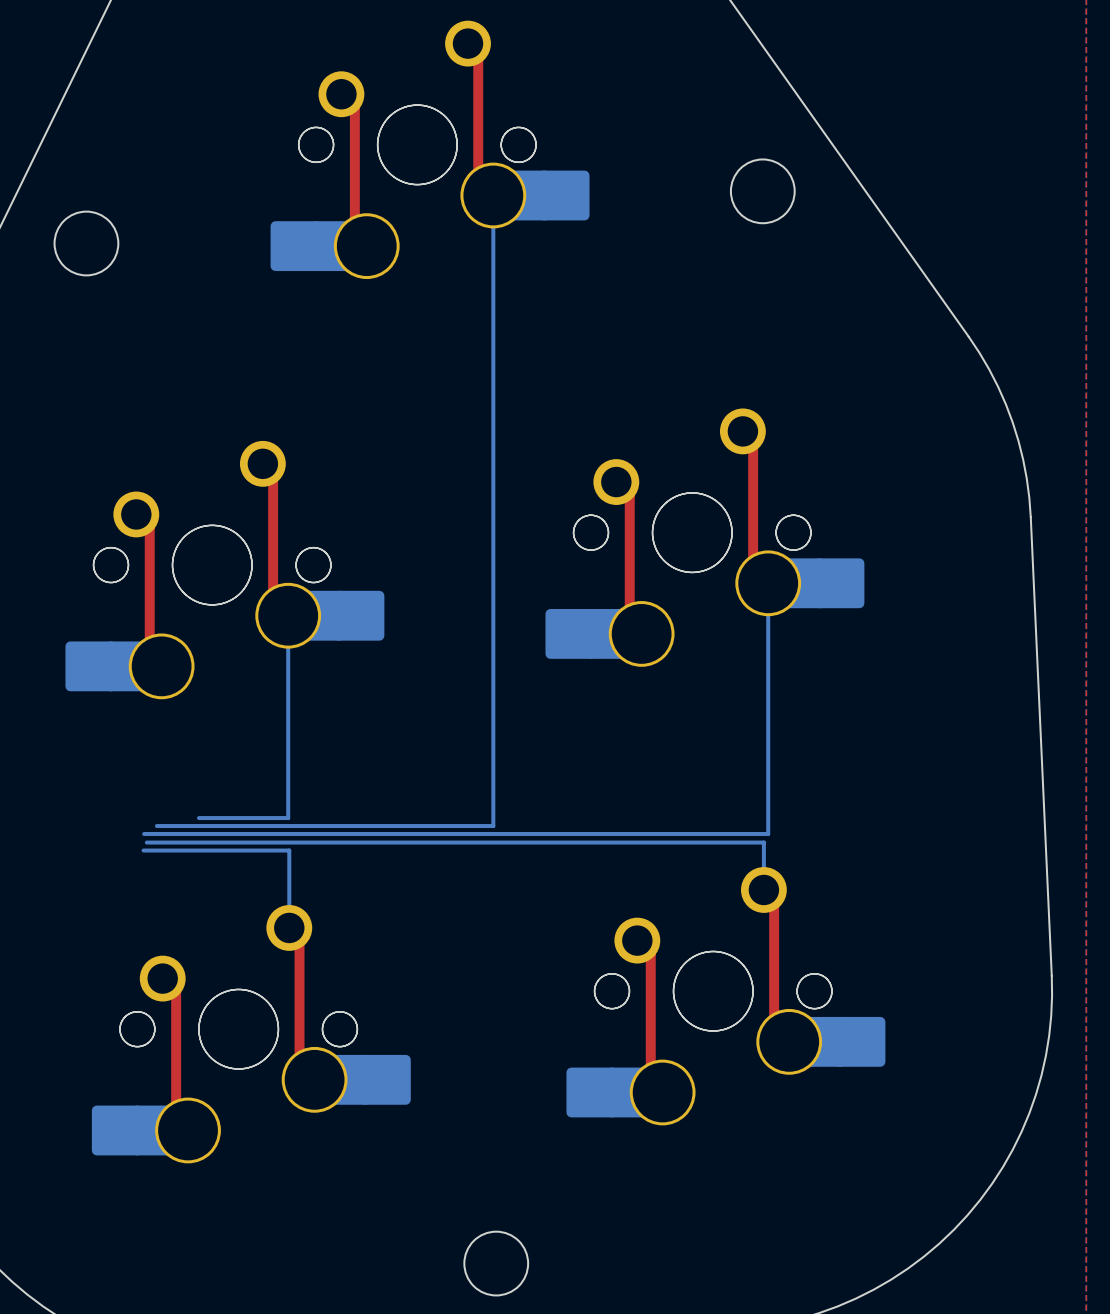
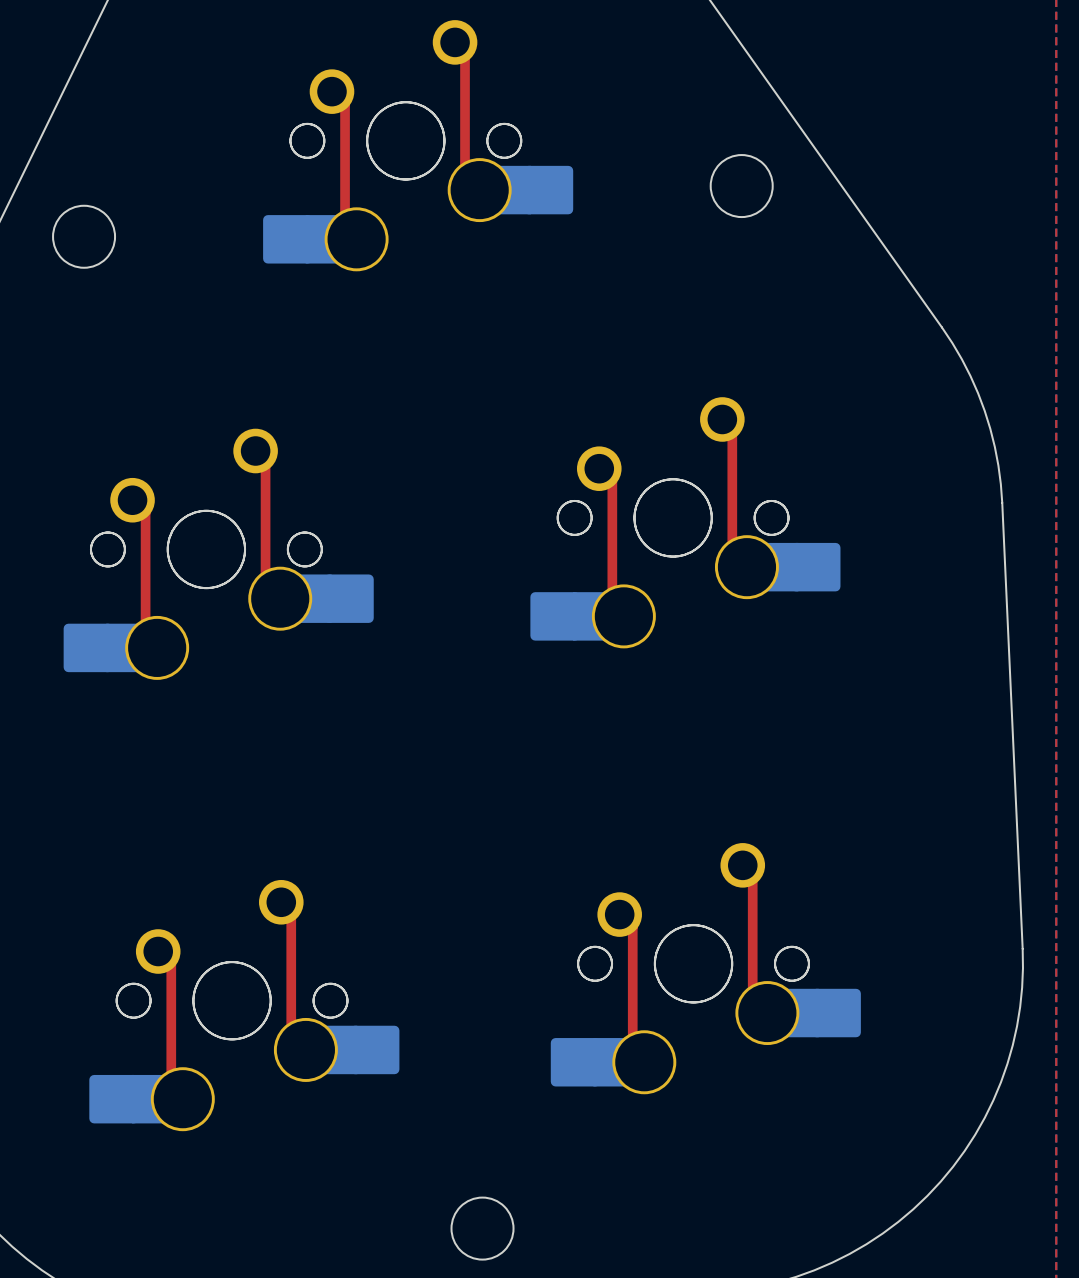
bottom track: (493, 195) (493, 826) (156, 826) -> none
bottom track: (768, 583) (768, 833) (144, 833) -> none
bottom track: (288, 615) (288, 818) (198, 818) -> none
bottom track: (146, 842) (763, 842) (763, 889) -> none
bottom track: (143, 850) (289, 850) (289, 927) -> none

